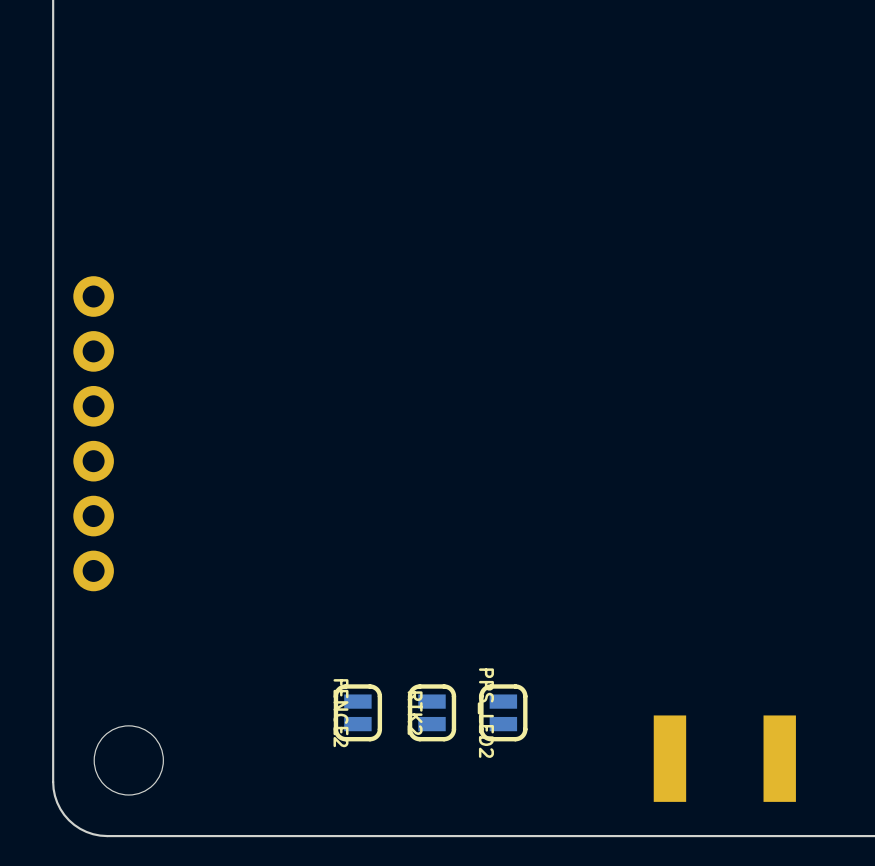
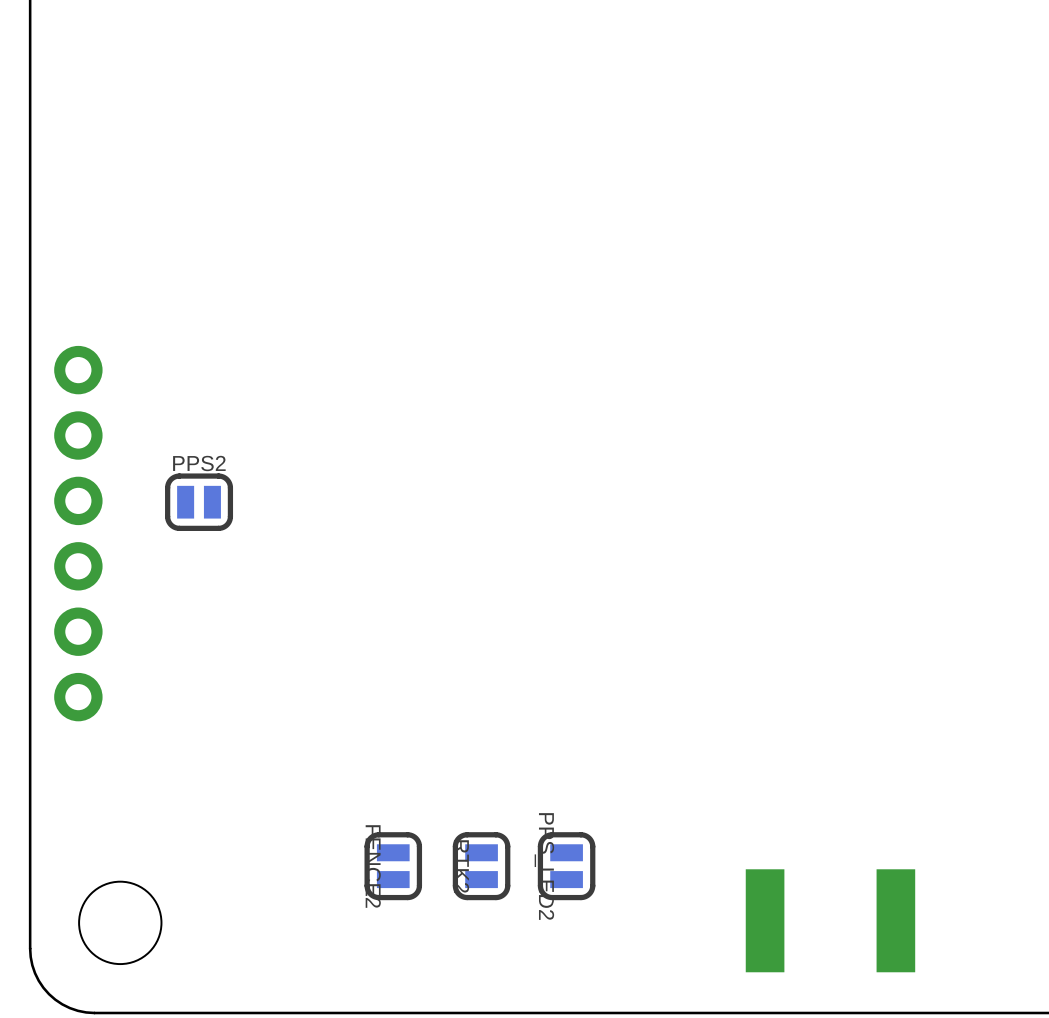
PPS2: none -> (199, 502)

